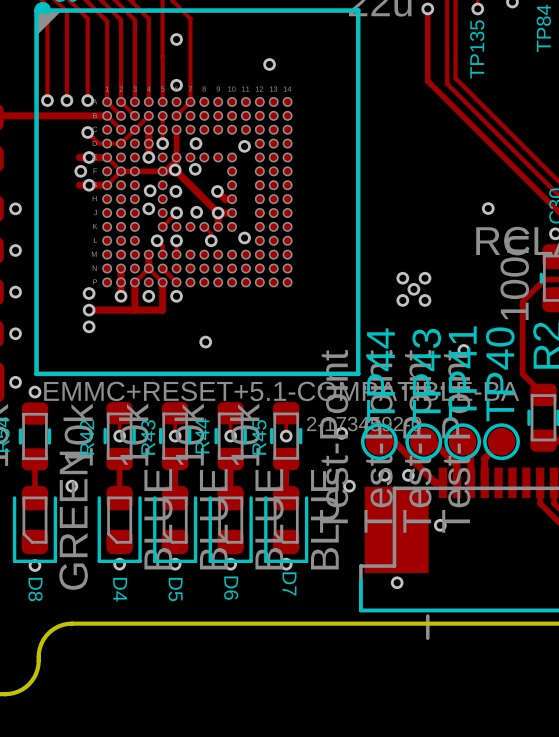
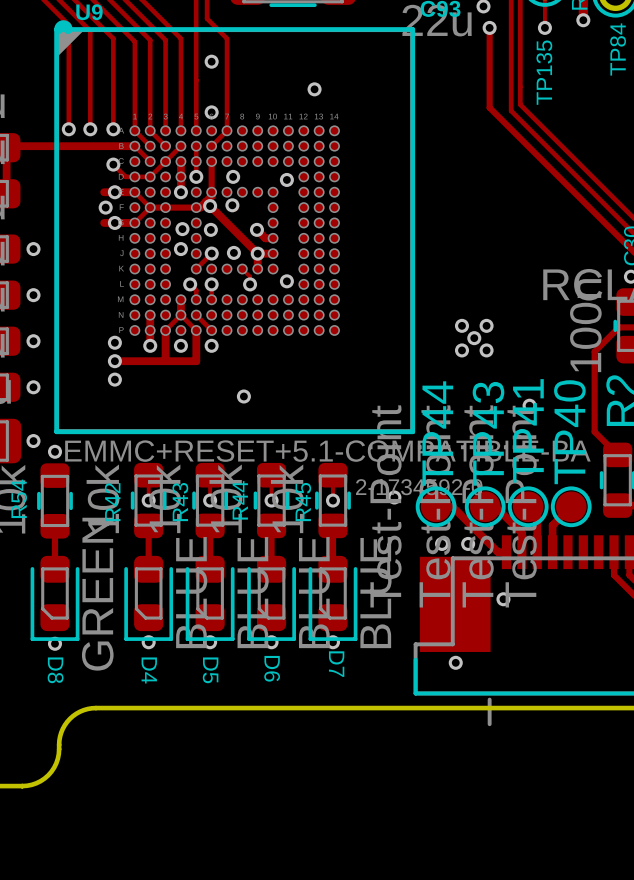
via: (488, 208) -> none
via: (71, 486) -> none
via: (349, 486) -> none

